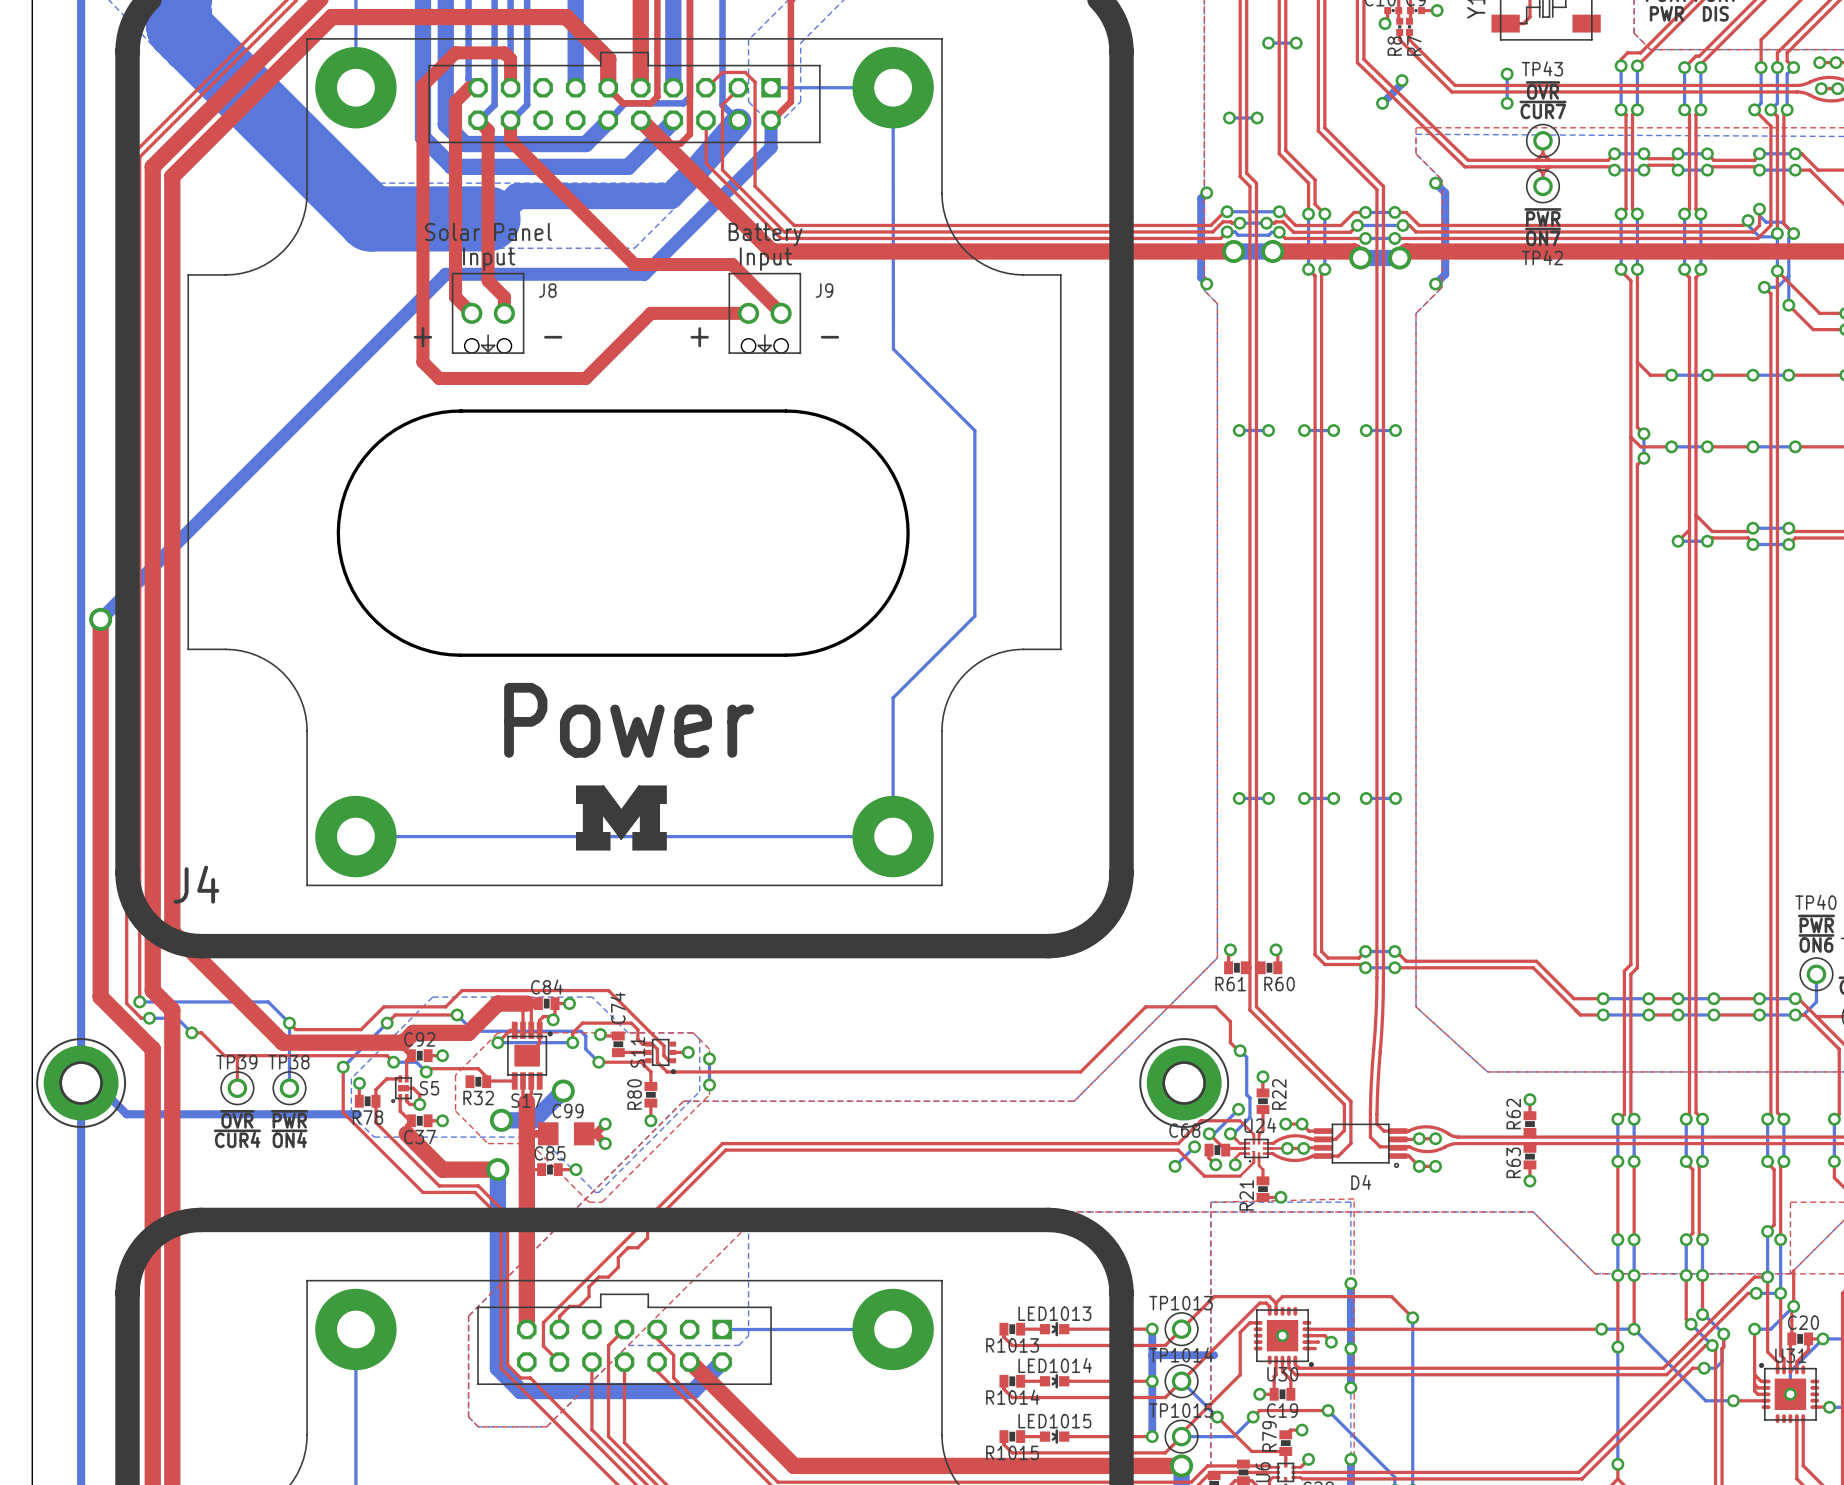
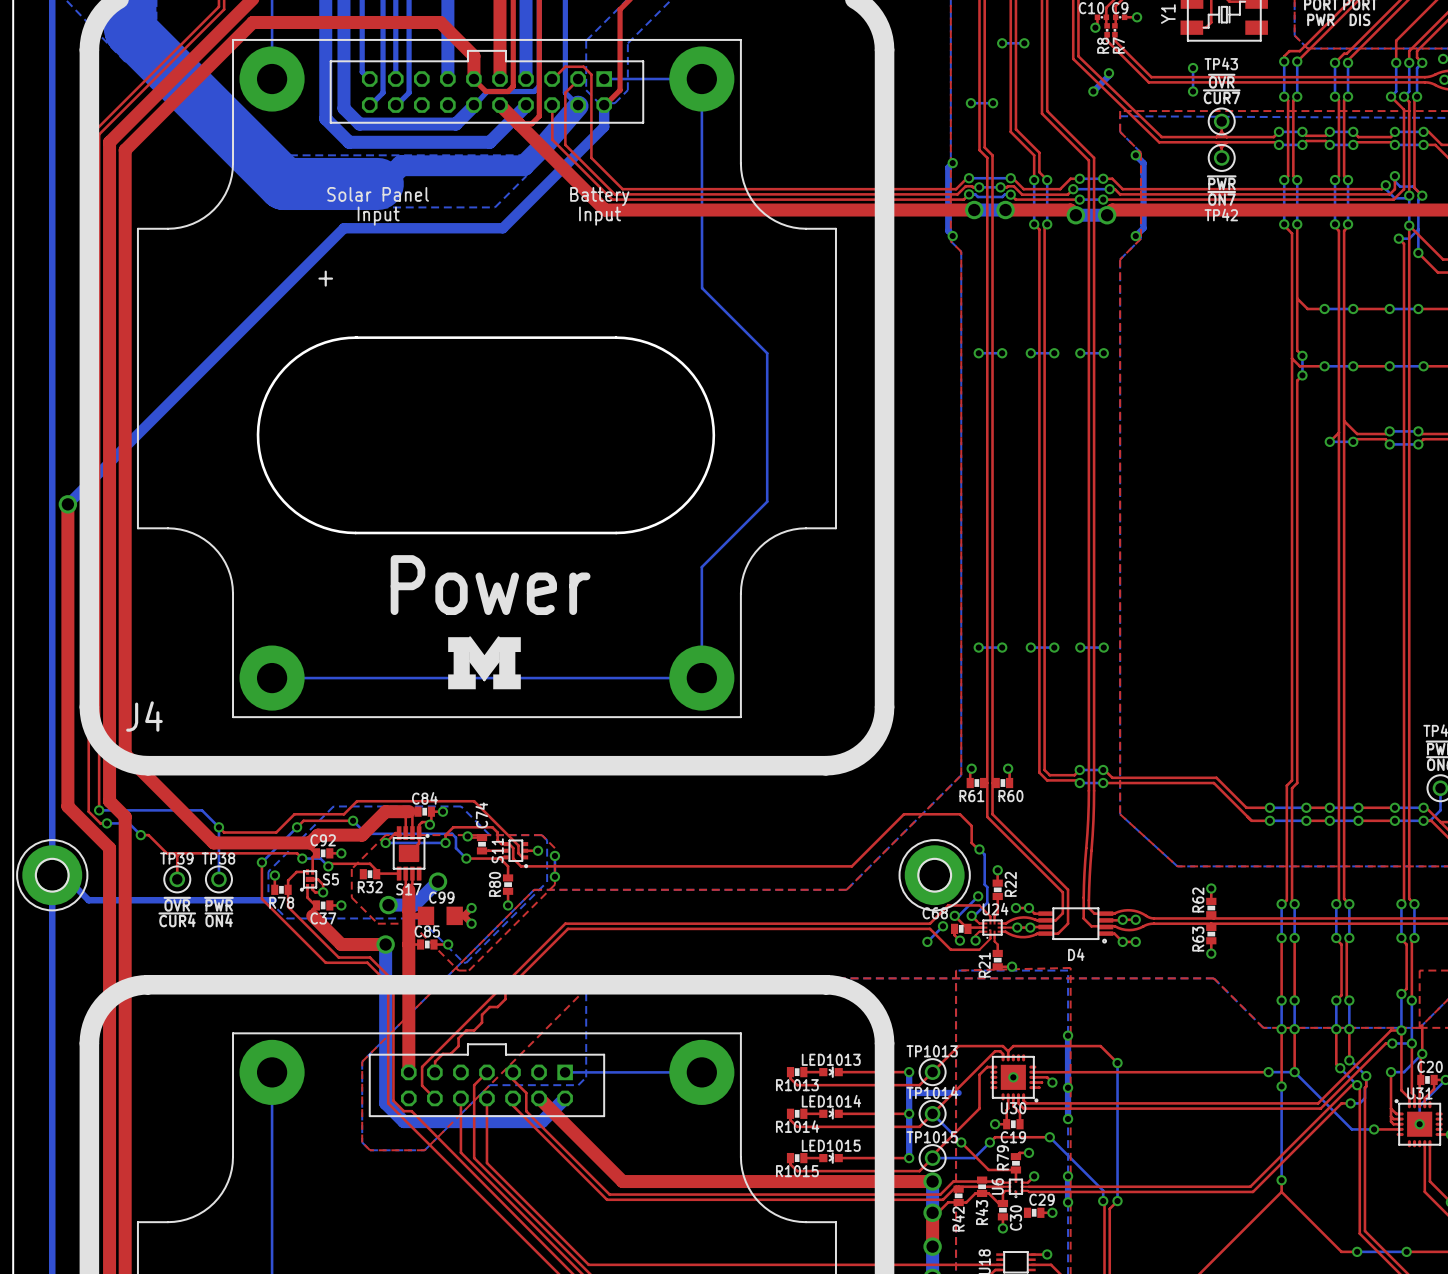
top track: (478, 87) (469, 87) (455, 101) (455, 297) (471, 313) -> none
top track: (510, 87) (510, 59) (504, 52) (455, 52) (422, 85) (422, 362) (439, 378) (585, 378) (650, 313) (748, 313) -> none
top track: (478, 120) (488, 130) (488, 280) (504, 297) (504, 313) -> none
top track: (510, 120) (510, 140) (634, 264) (732, 264) (781, 313) -> none
J8: (488, 313) -> none
J9: (764, 313) -> none
text: - (553, 337) -> none
text: + (699, 337) -> none
text: - (829, 337) -> none

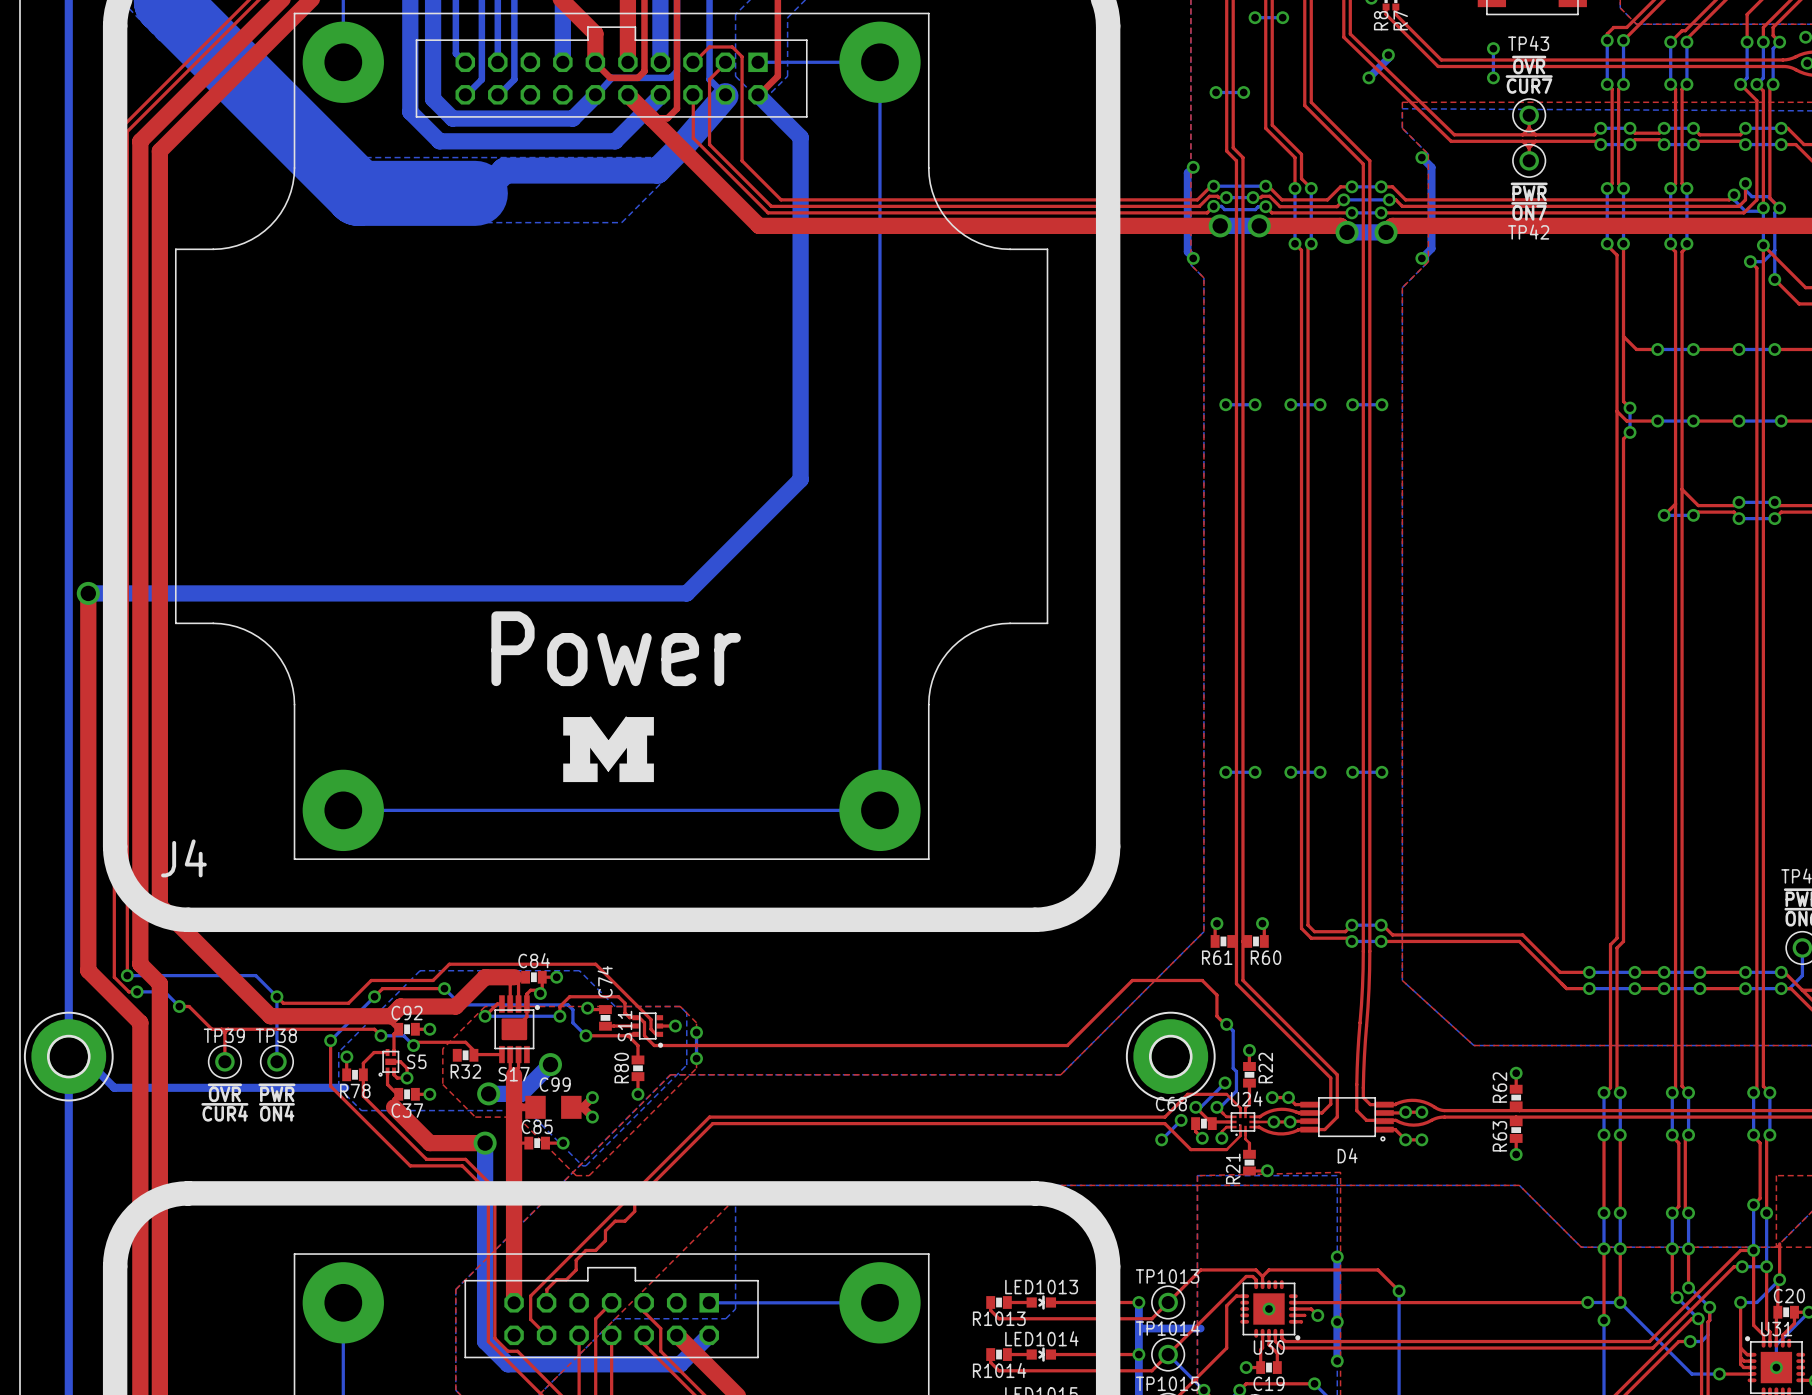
bottom track: (701, 79) (702, 288) (767, 353) (767, 501) (701, 567) -> (879, 62) (879, 671)
bottom track: (604, 105) (604, 126) (502, 228) (343, 228) (67, 504) -> (758, 94) (800, 137) (800, 479) (686, 593) (88, 593)
text: Solar Panel (378, 194) -> none
text: Battery (599, 196) -> none
text: Input (378, 216) -> none
text: Input (600, 216) -> none
text: + (325, 278) -> none
board edge: (355, 337) (616, 337) (647, 342) (676, 358) (693, 375) (702, 388) (708, 403) (713, 427) (713, 443) (708, 467) (693, 495) (676, 512) (655, 524) (632, 531) (355, 532) (323, 527) (295, 512) (273, 488) (263, 466) (259, 450) (259, 418) (263, 402) (274, 381) (296, 357) (325, 342) (340, 338) (348, 337) (356, 337) -> none
text position: Power (490, 585) -> Power (616, 648)
drawing position: (484, 663) -> (608, 749)

